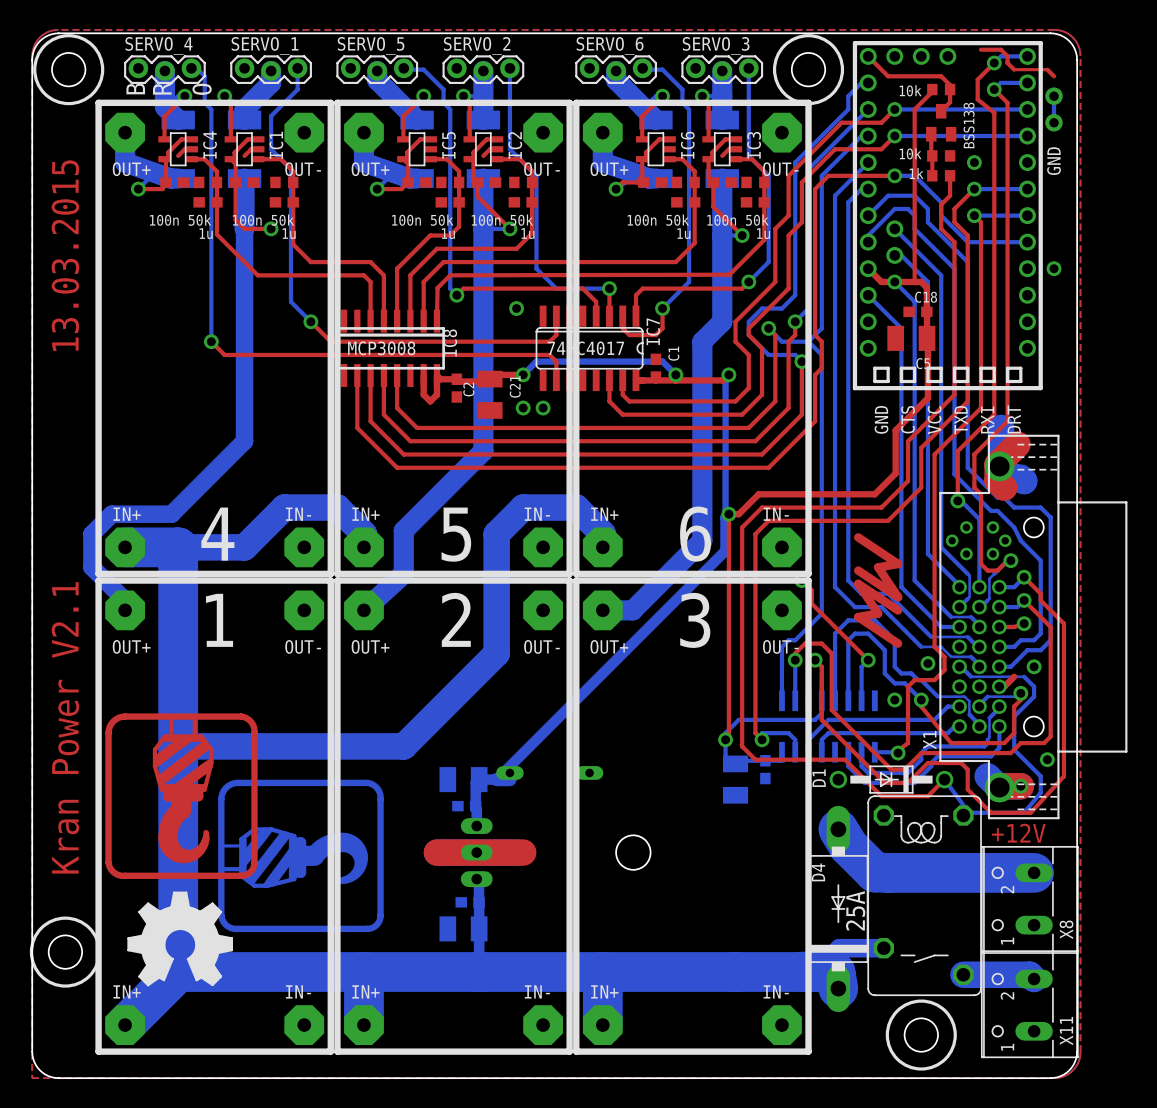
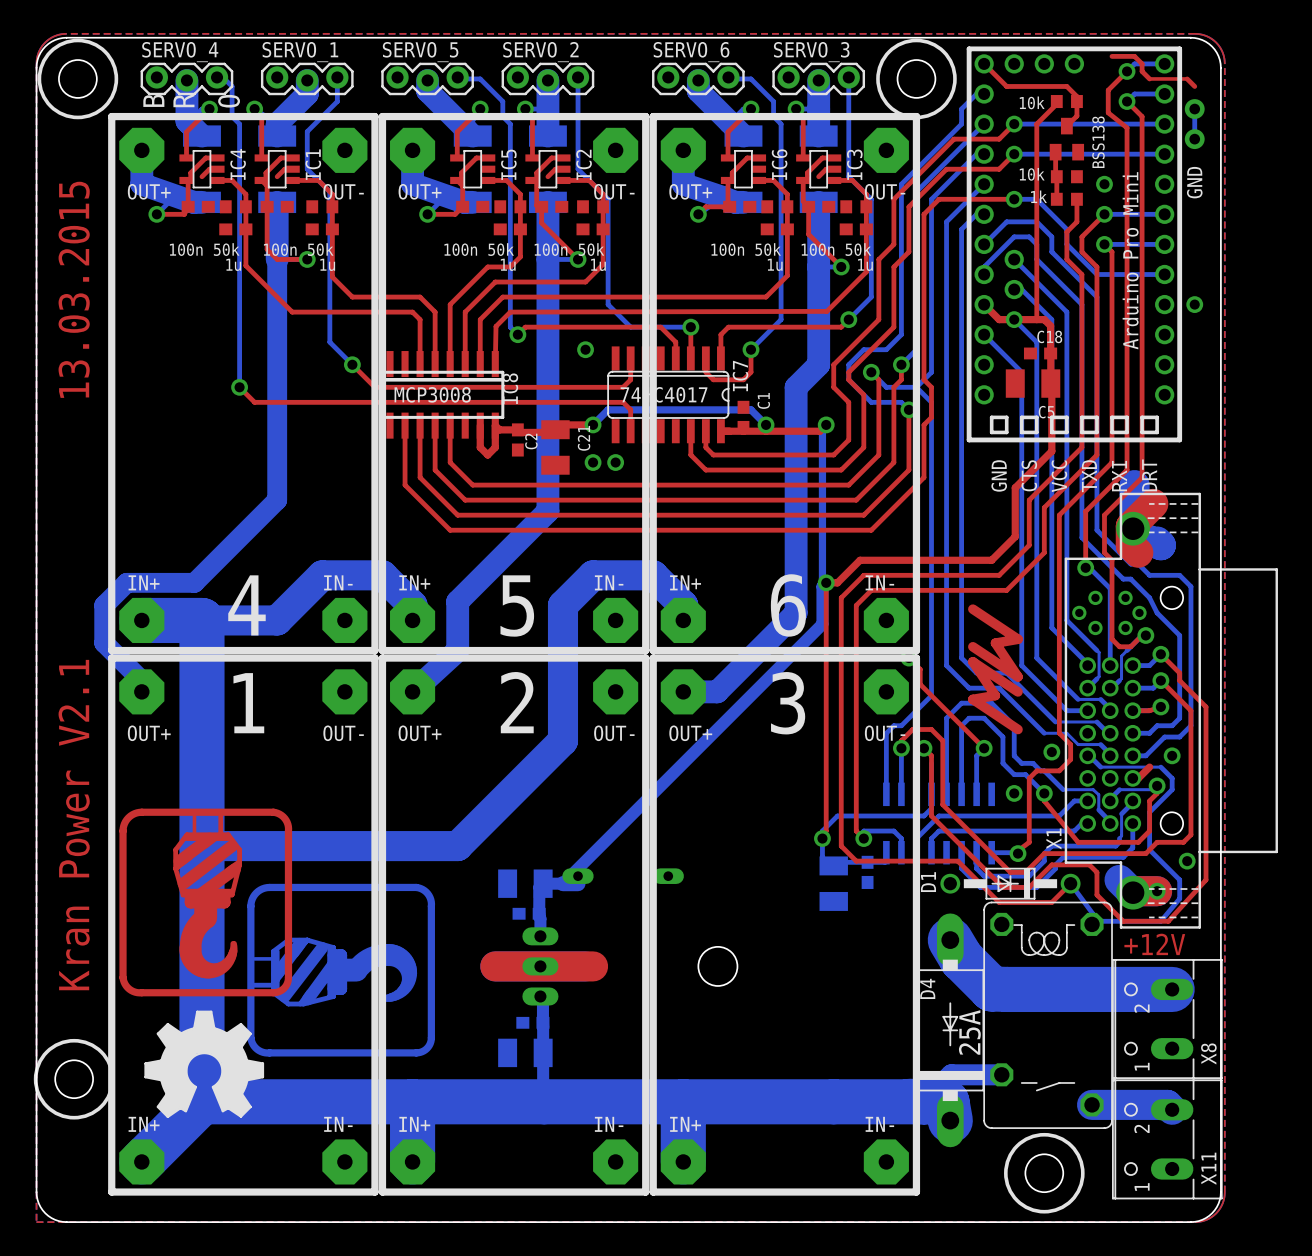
text: none -> Arduino Pro Mini (1130, 260)

